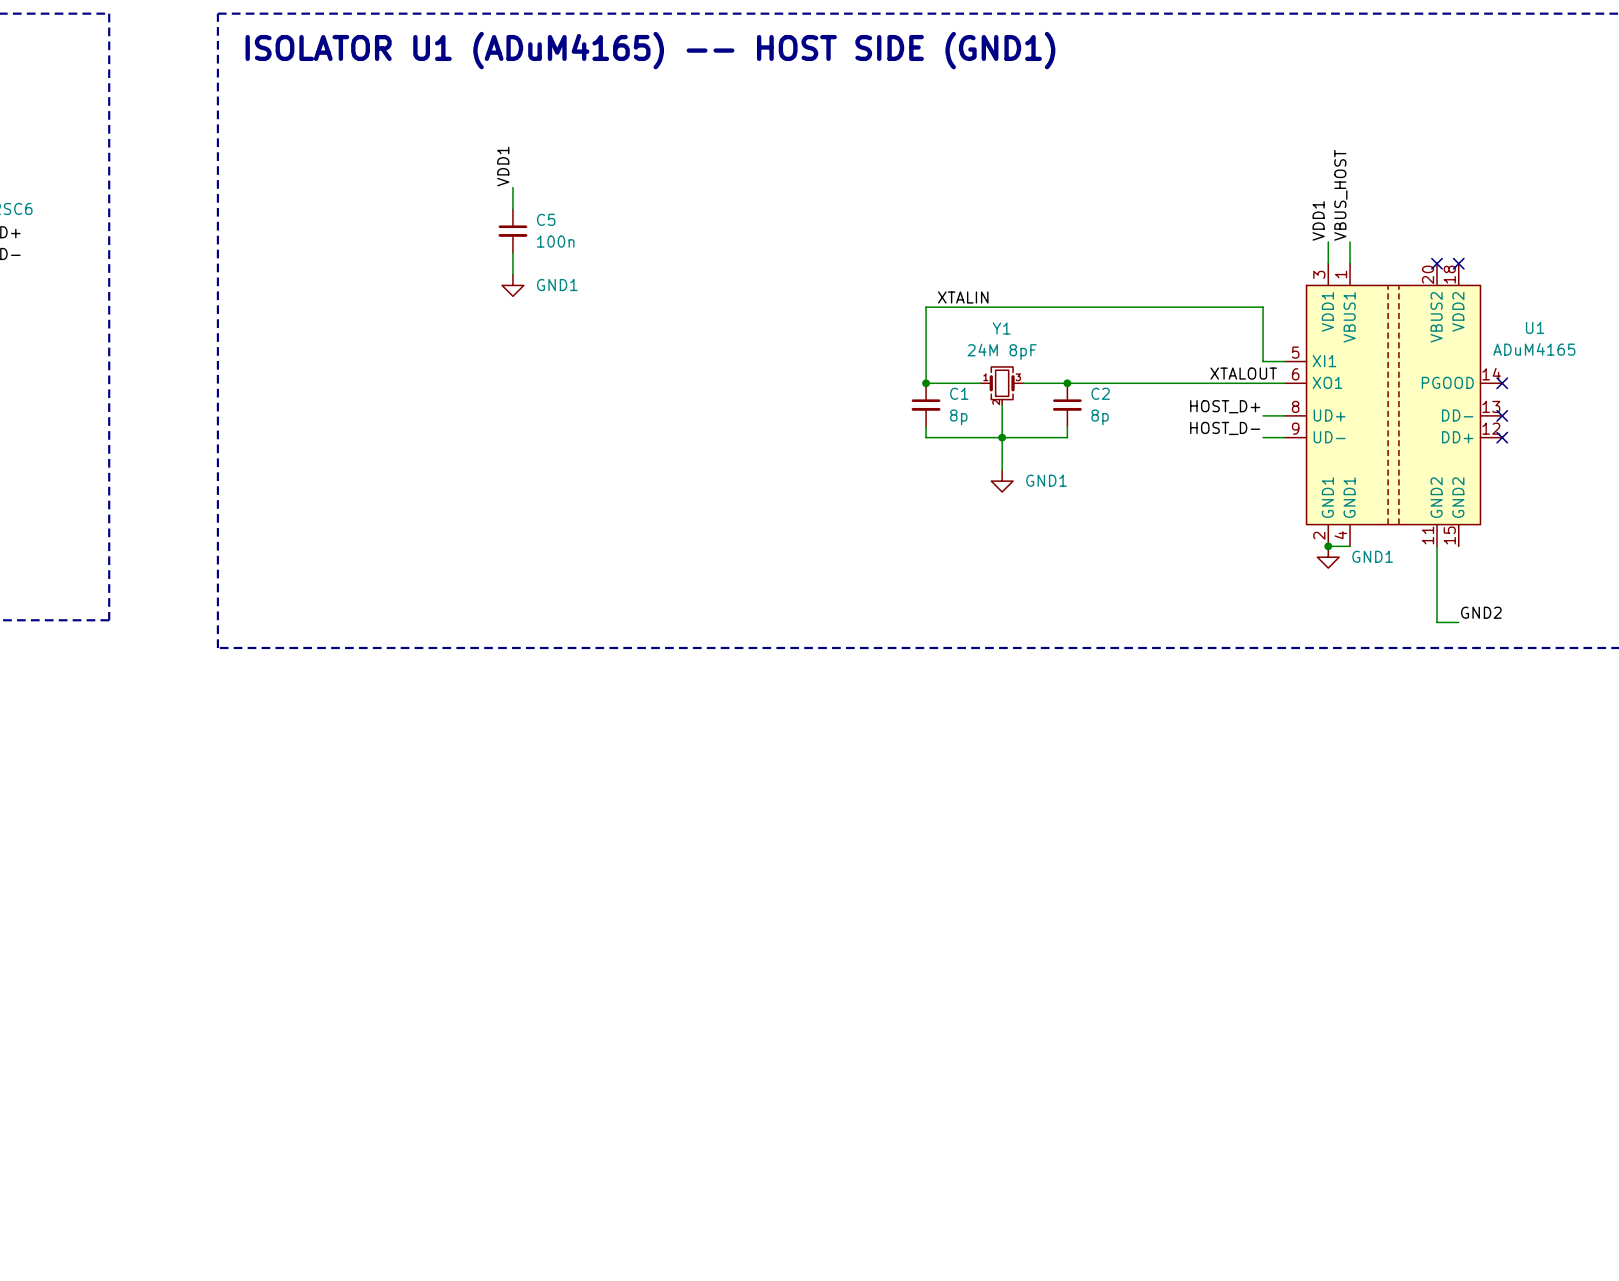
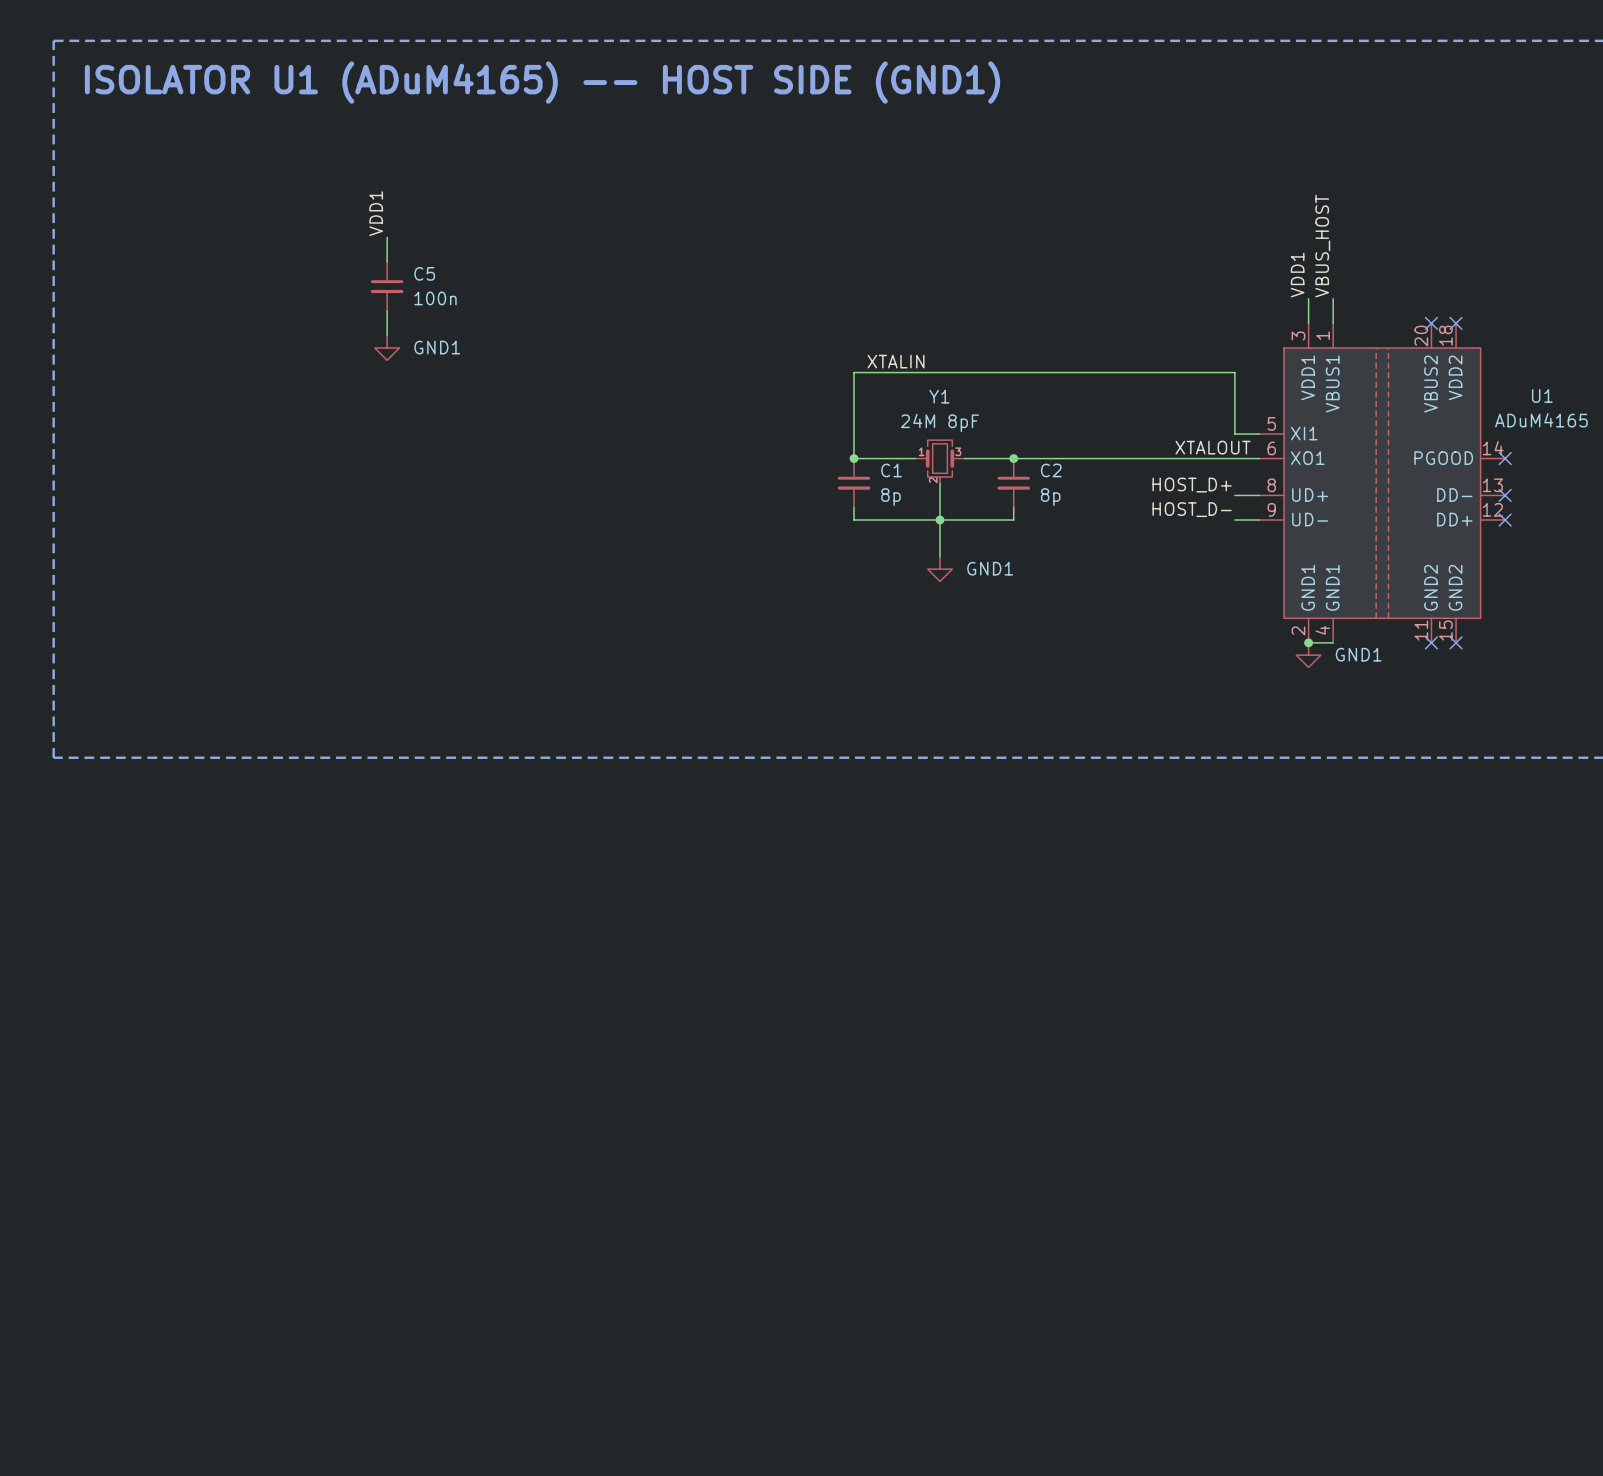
wire: (1437, 546) (1437, 622) (1458, 622) -> none
no-connect mark: none -> (1431, 642)
no-connect mark: none -> (1456, 642)
label: GND2 (1481, 612) -> none

